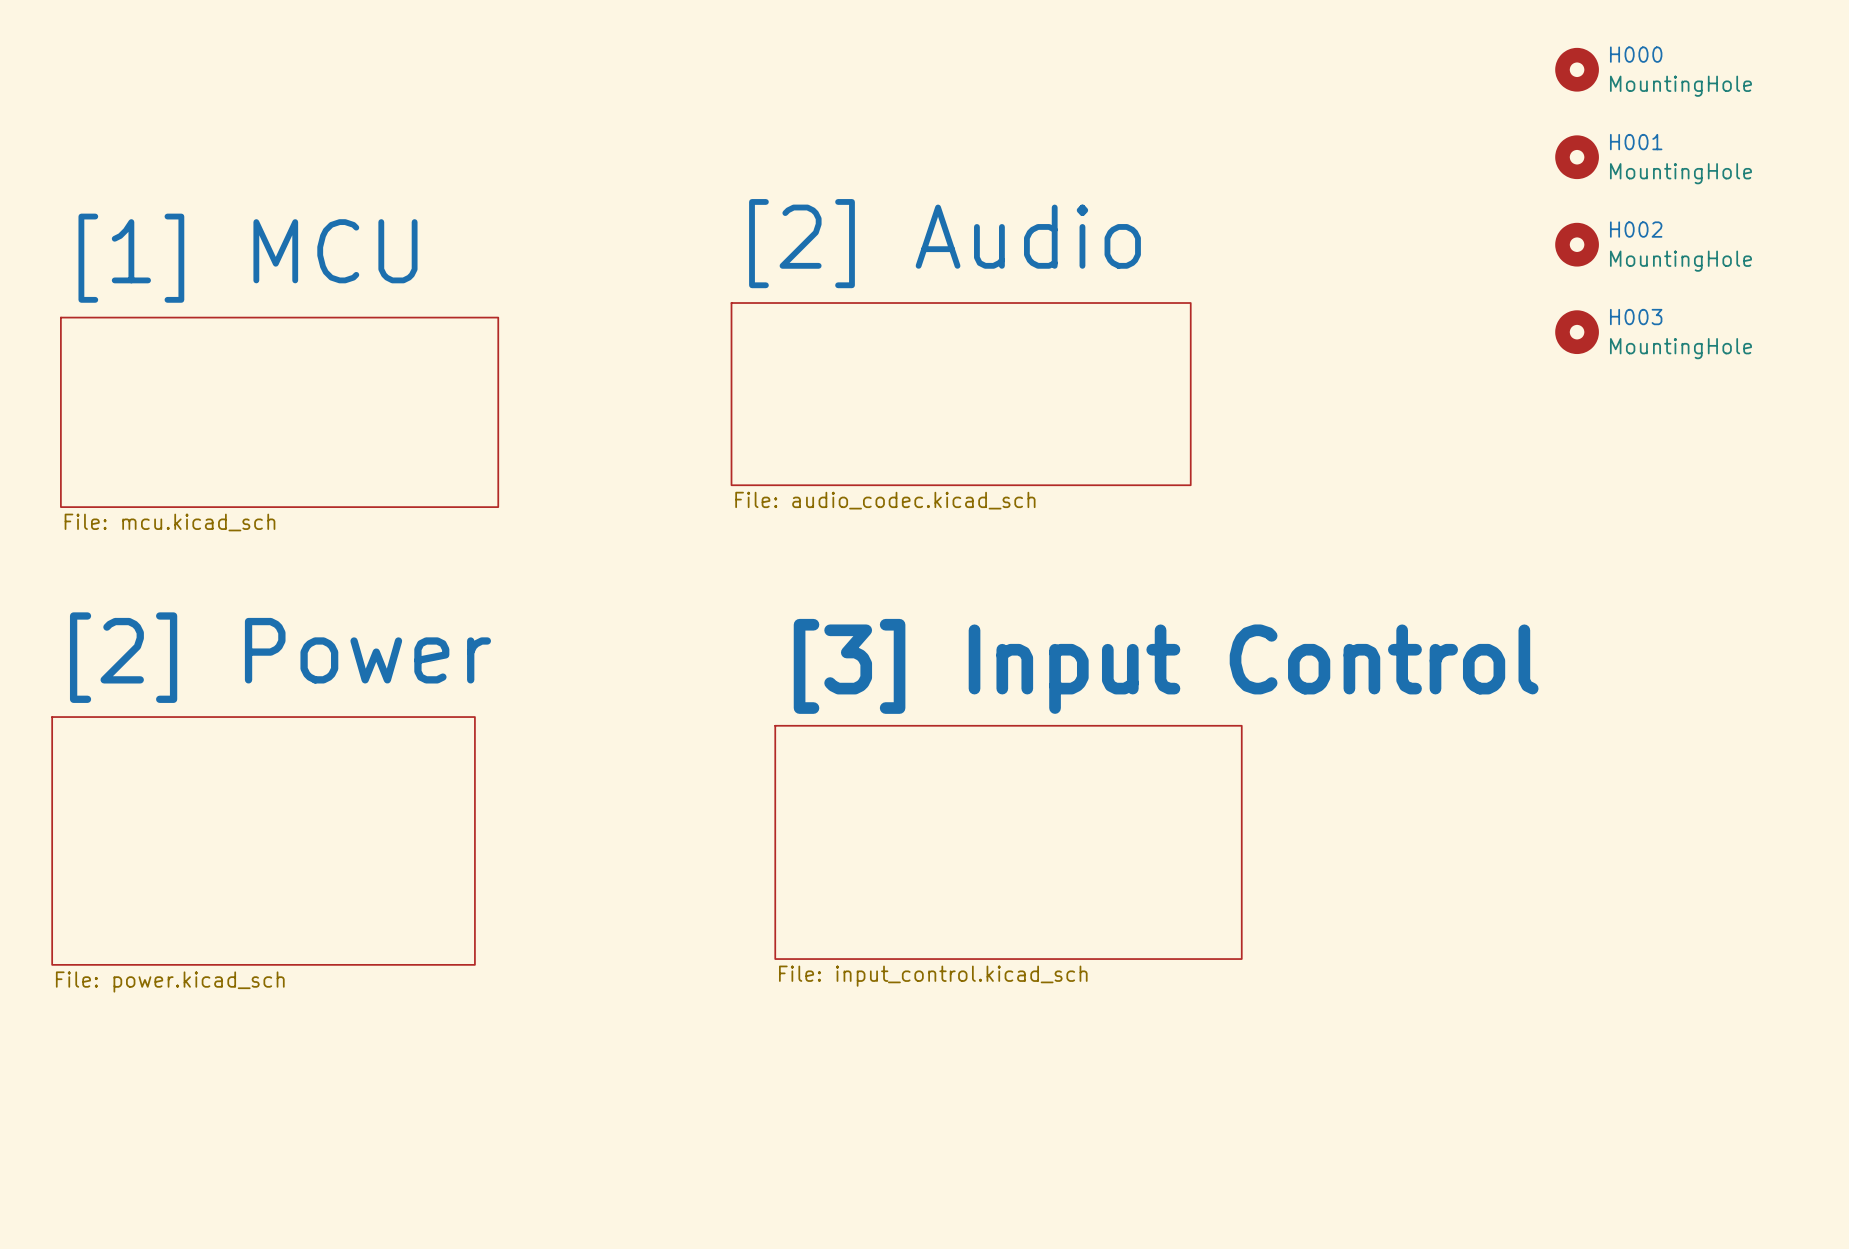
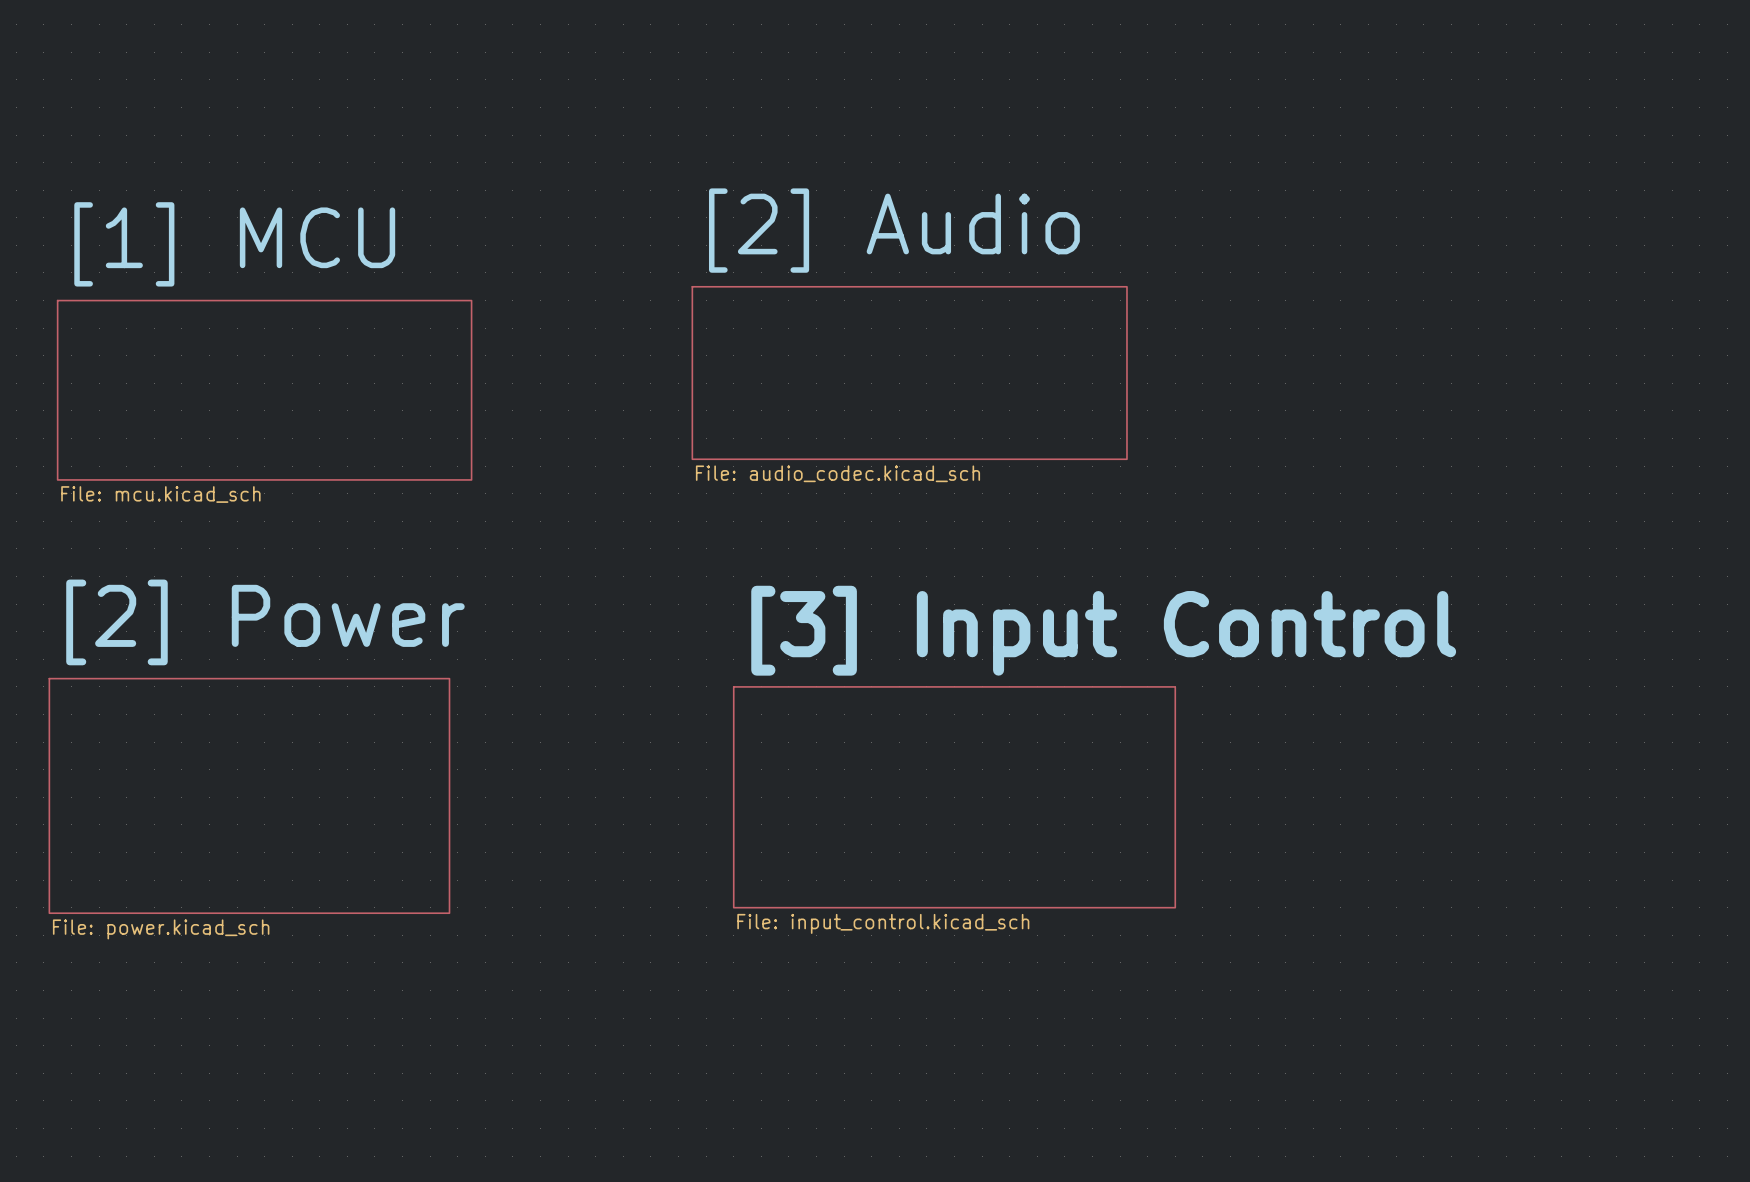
H000: MountingHole (1577, 69) -> none
H001: MountingHole (1577, 157) -> none
H002: MountingHole (1577, 244) -> none
H003: MountingHole (1577, 332) -> none

